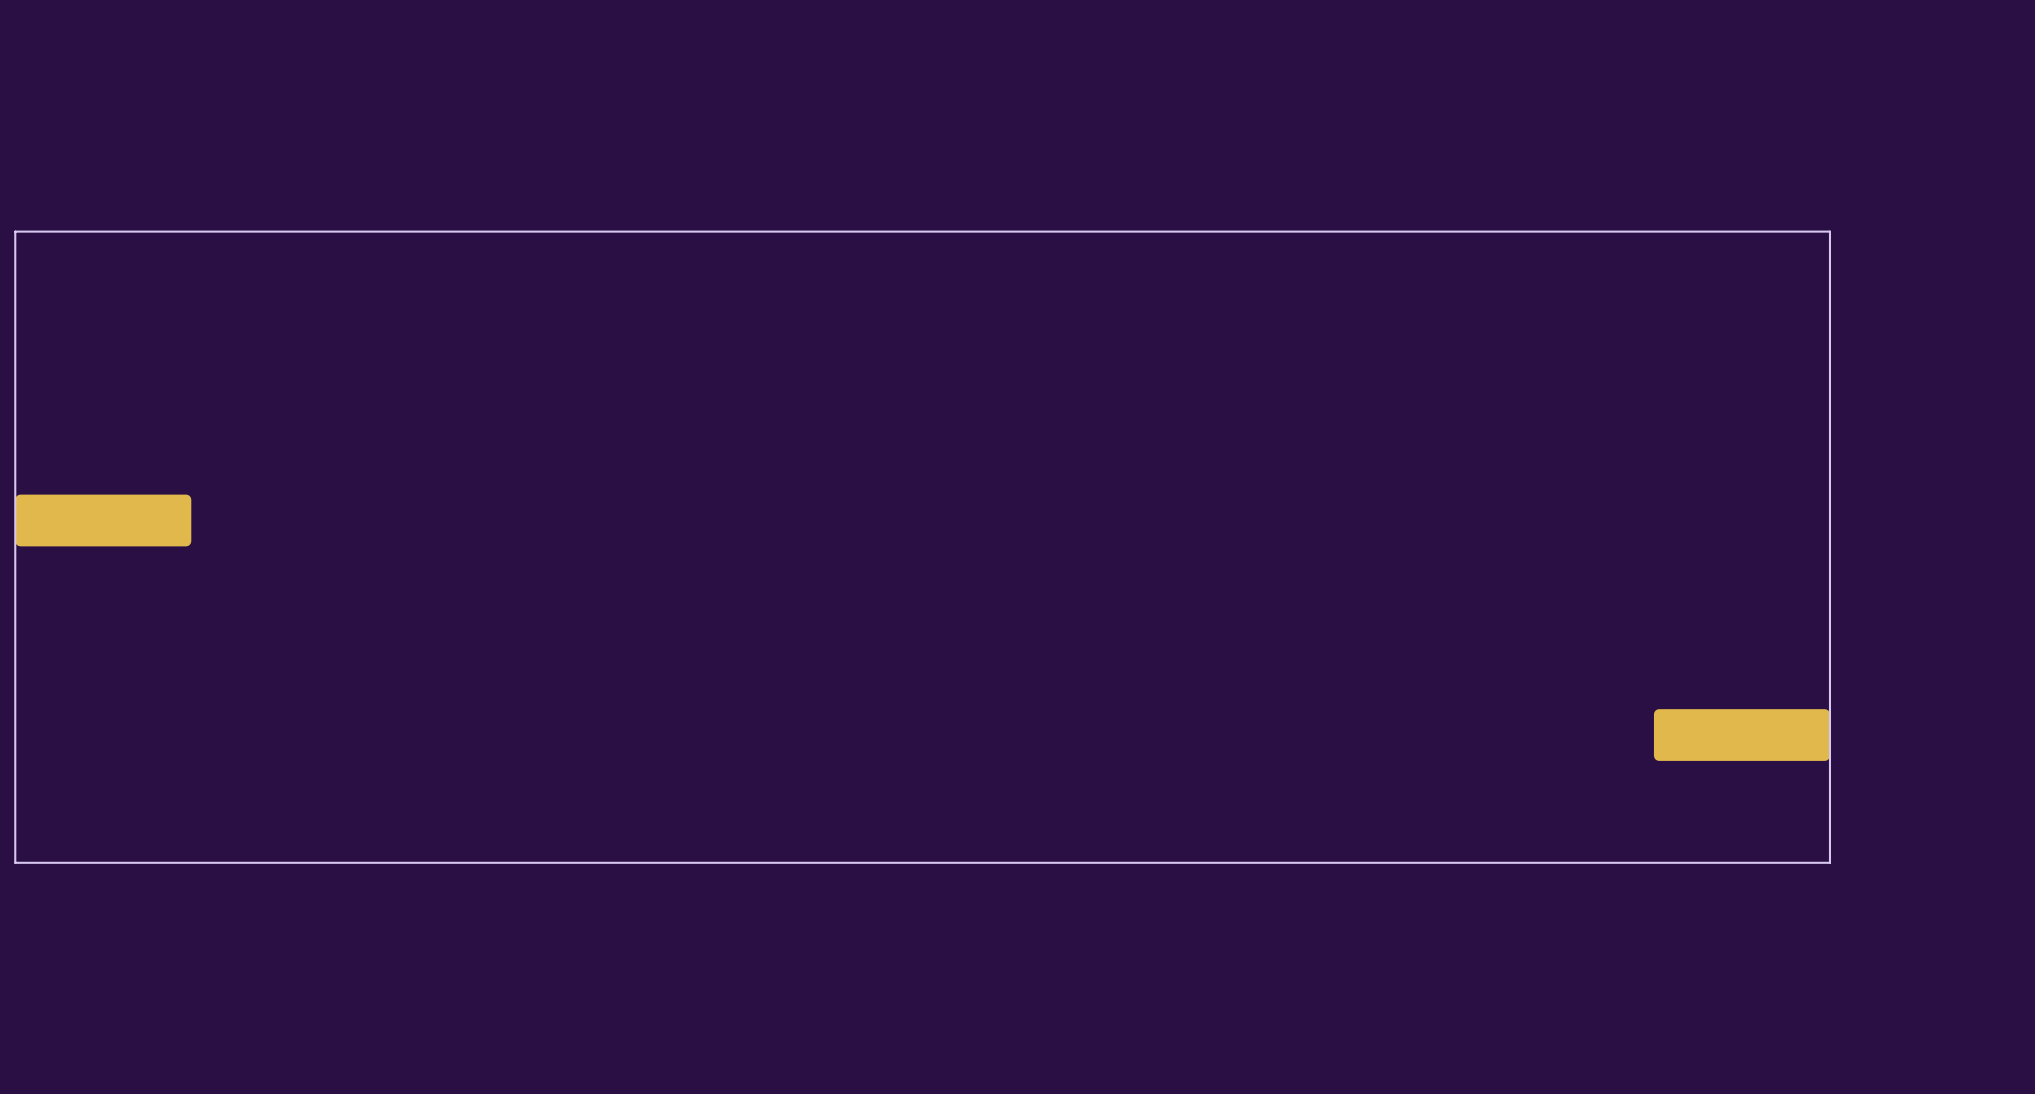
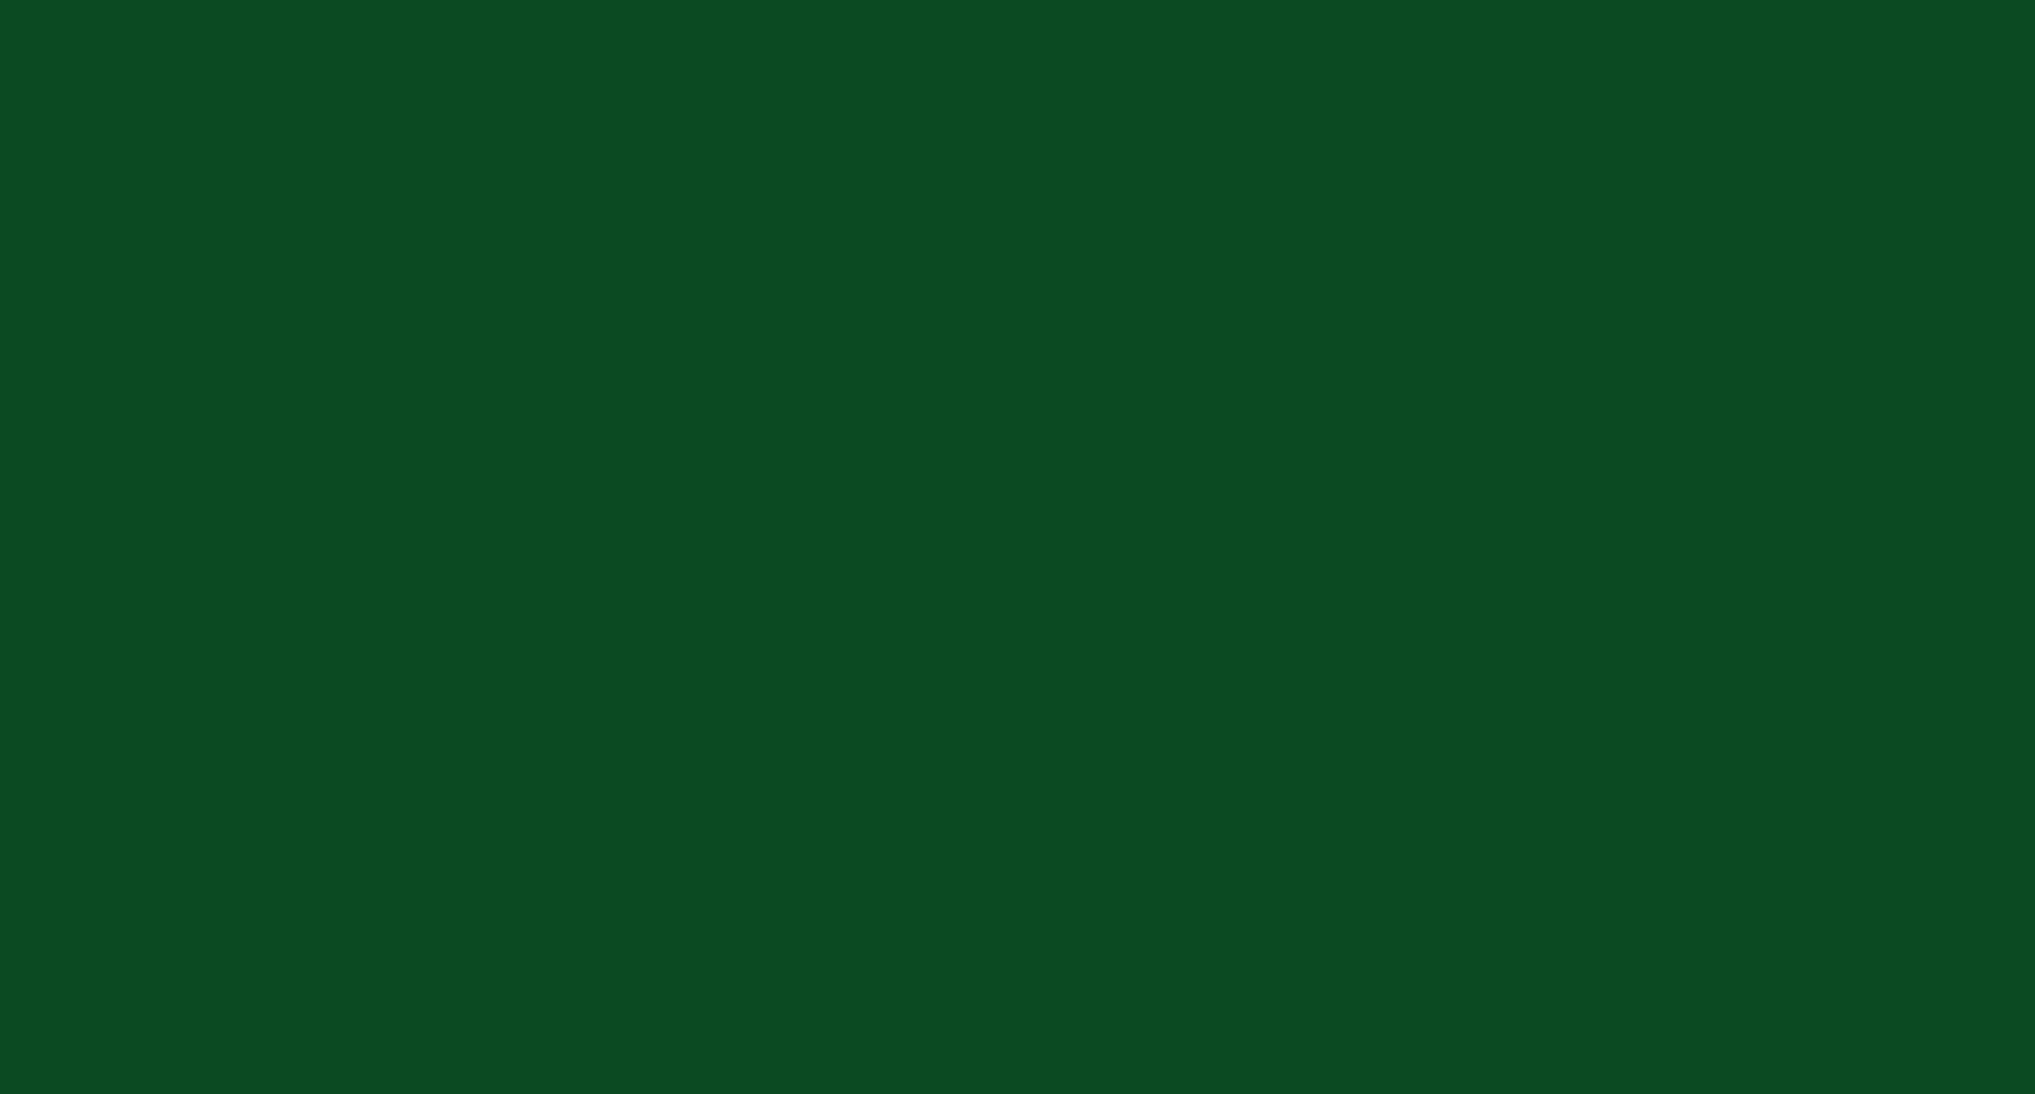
board edge: (1829, 231) (15, 231) (15, 862) (1829, 862) (1829, 231) -> none
part: (103, 520) -> none
part: (1741, 735) -> none

